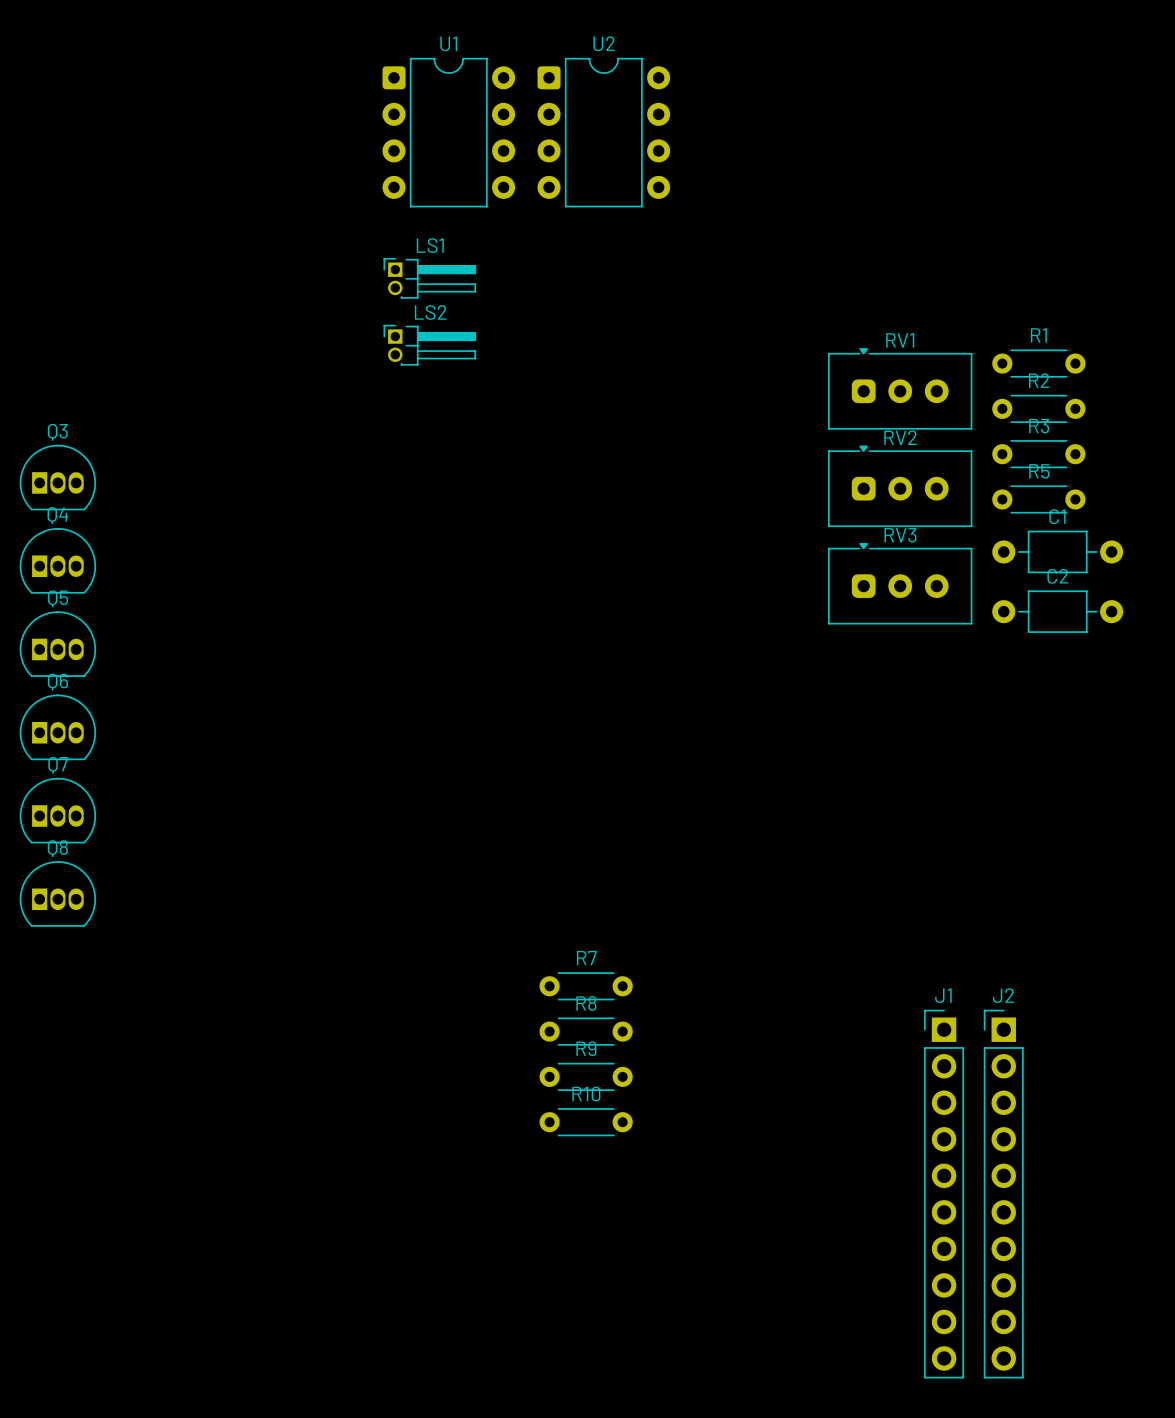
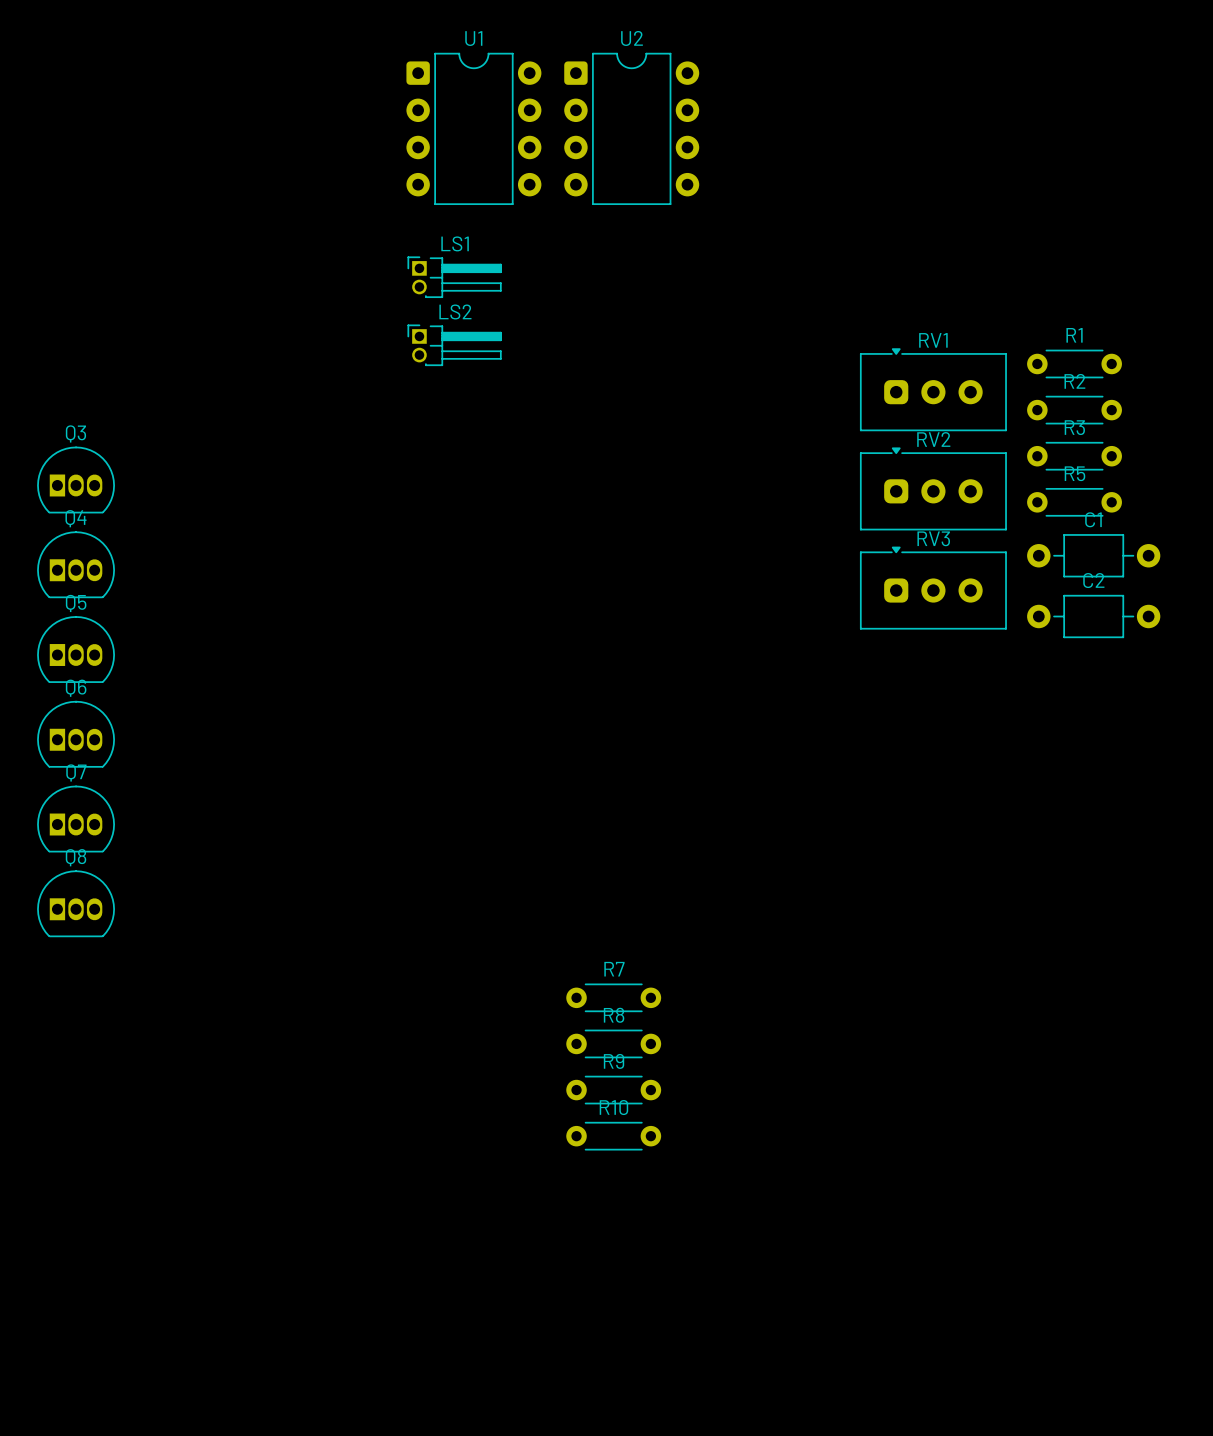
J1: (944, 1194) -> none
J2: (1003, 1194) -> none

